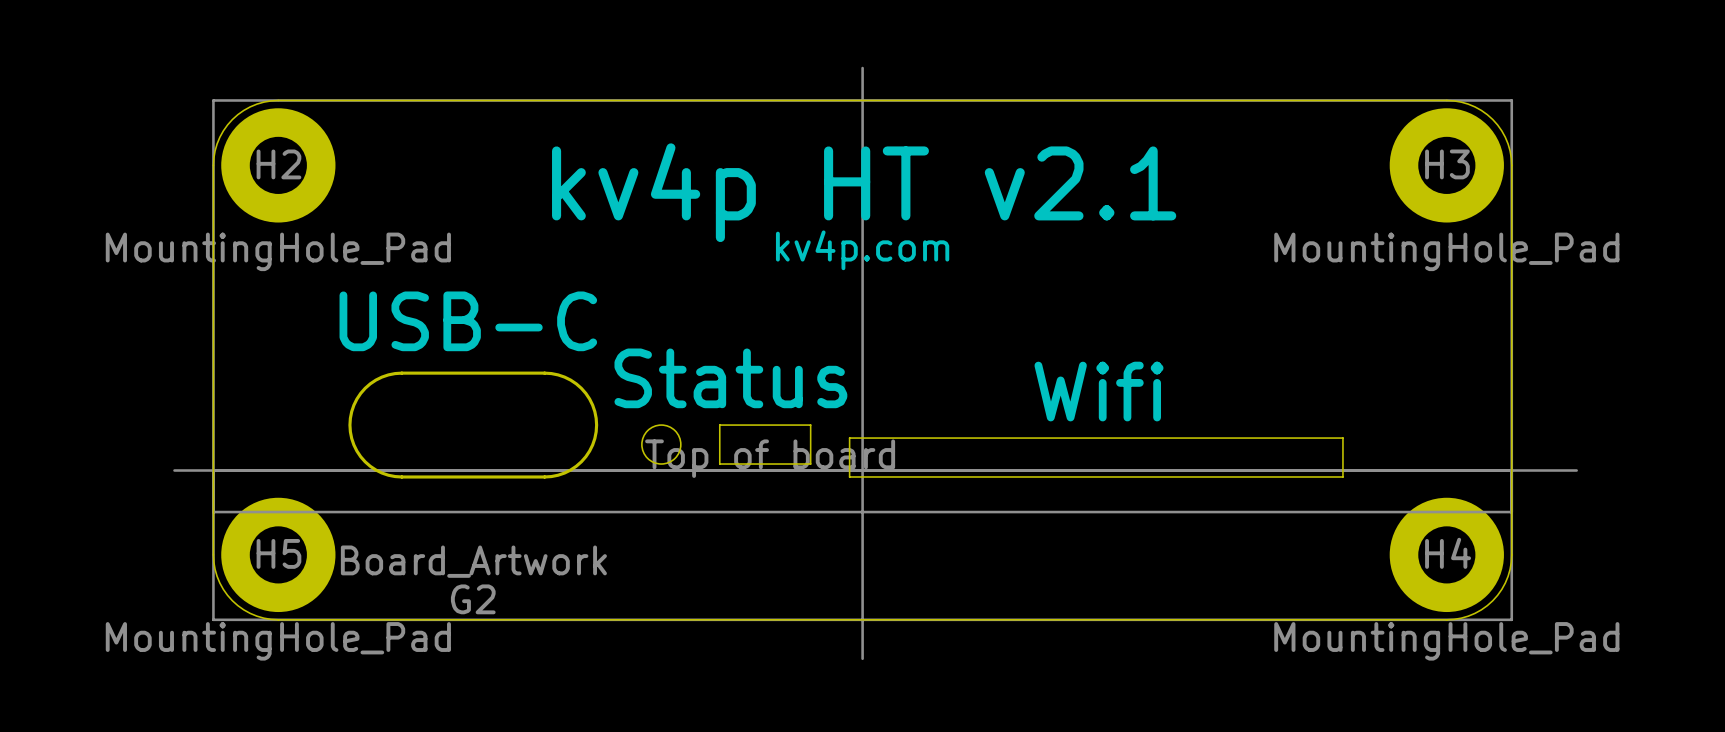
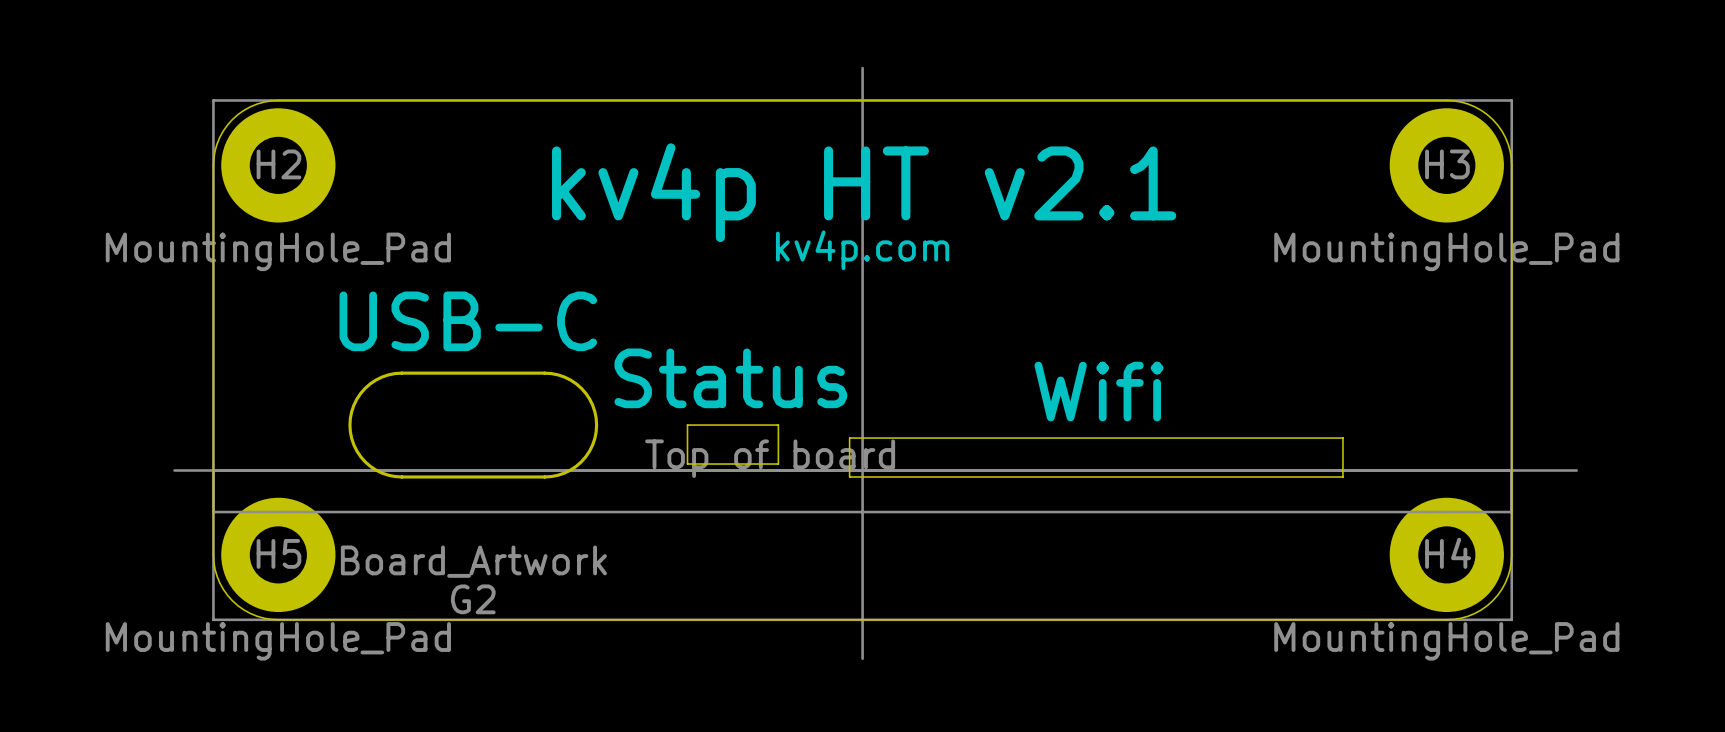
round board edge: [641, 424, 682, 465] -> none
board edge: (719, 425) (719, 464) -> (719, 425) (687, 425) (687, 464) (719, 464)
board edge: (778, 425) (810, 425) (810, 464) (778, 464) -> (778, 425) (778, 464)

